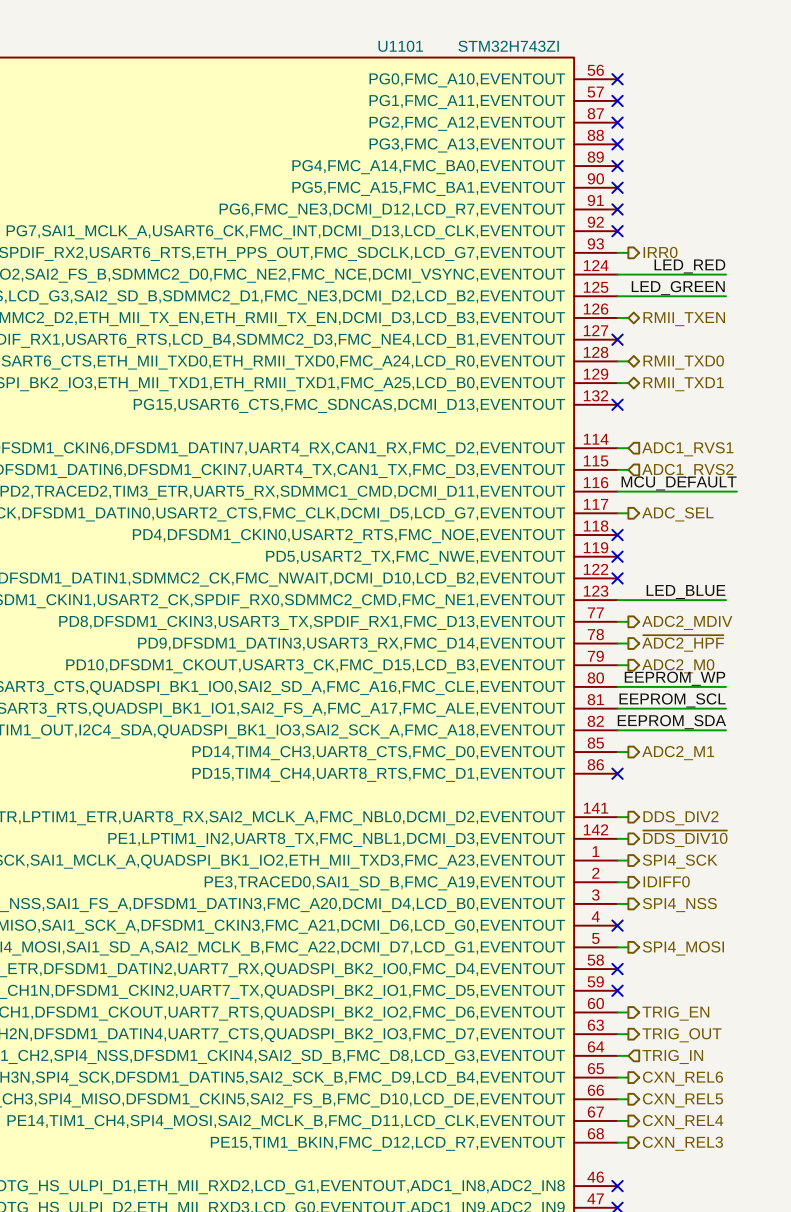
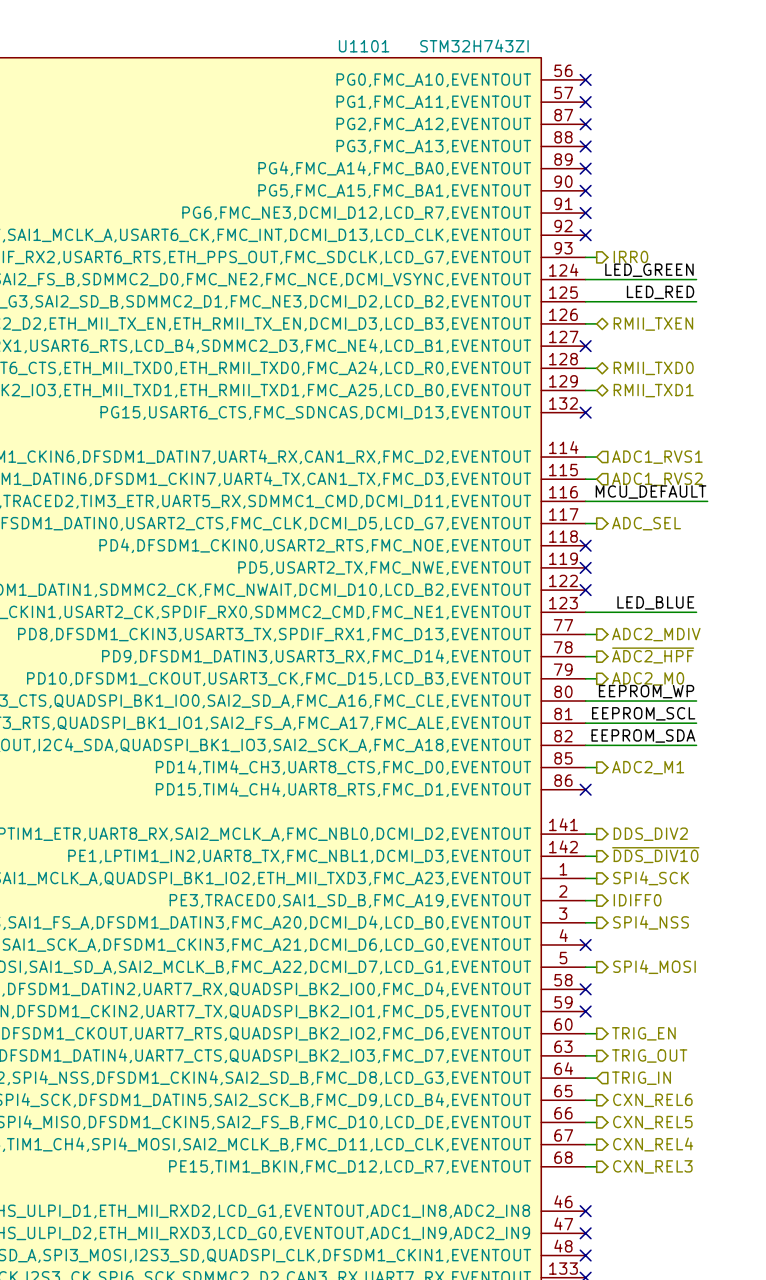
label: LED_RED (689, 266) -> LED_GREEN (649, 270)
label: LED_GREEN (678, 288) -> LED_RED (660, 292)

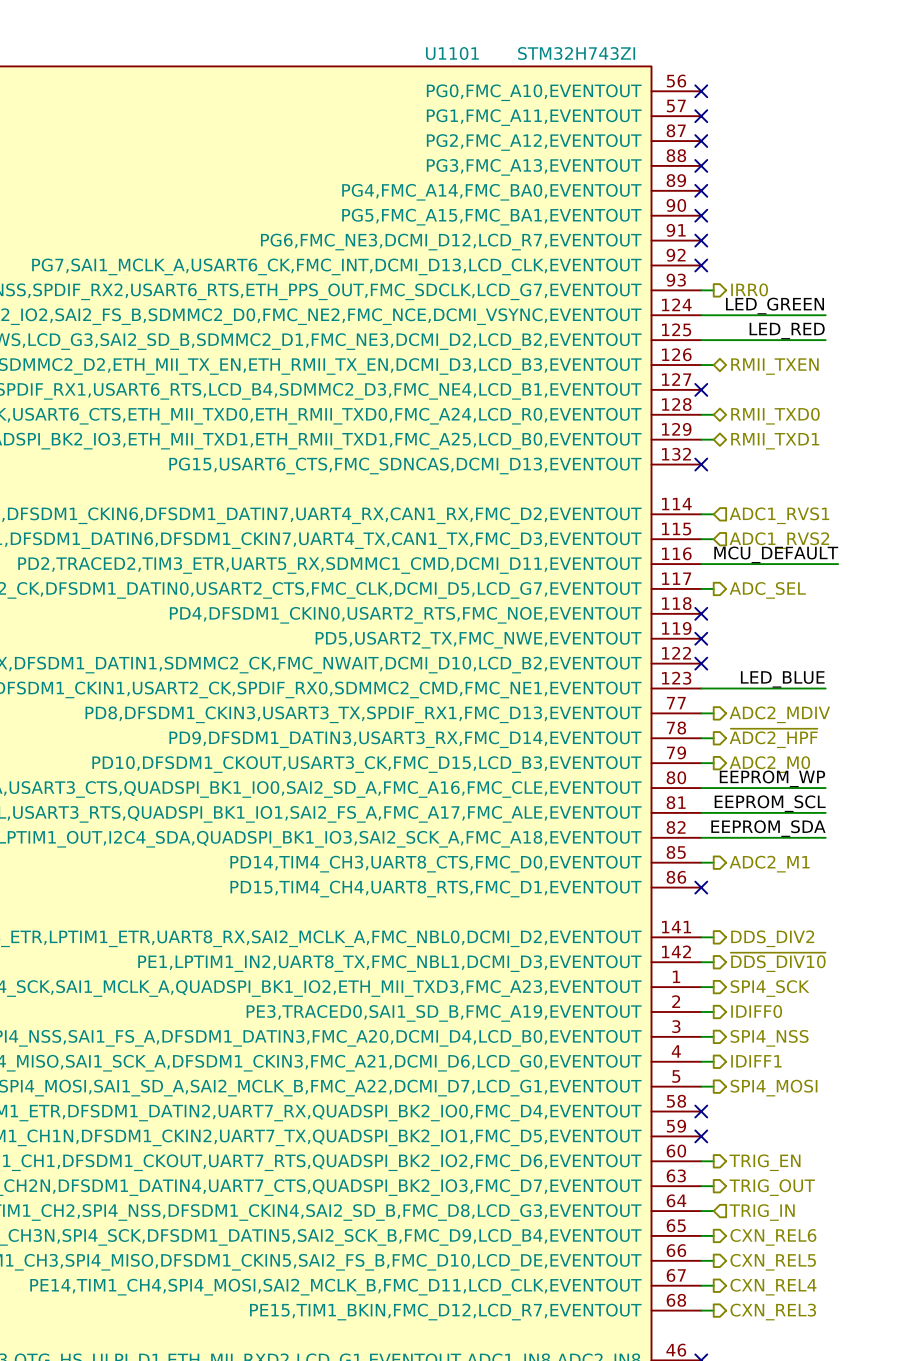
wire: none -> (701, 1061) (713, 1061)
no-connect mark: (585, 944) -> none
hierarchical label: none -> IDIFF1 (756, 1061)

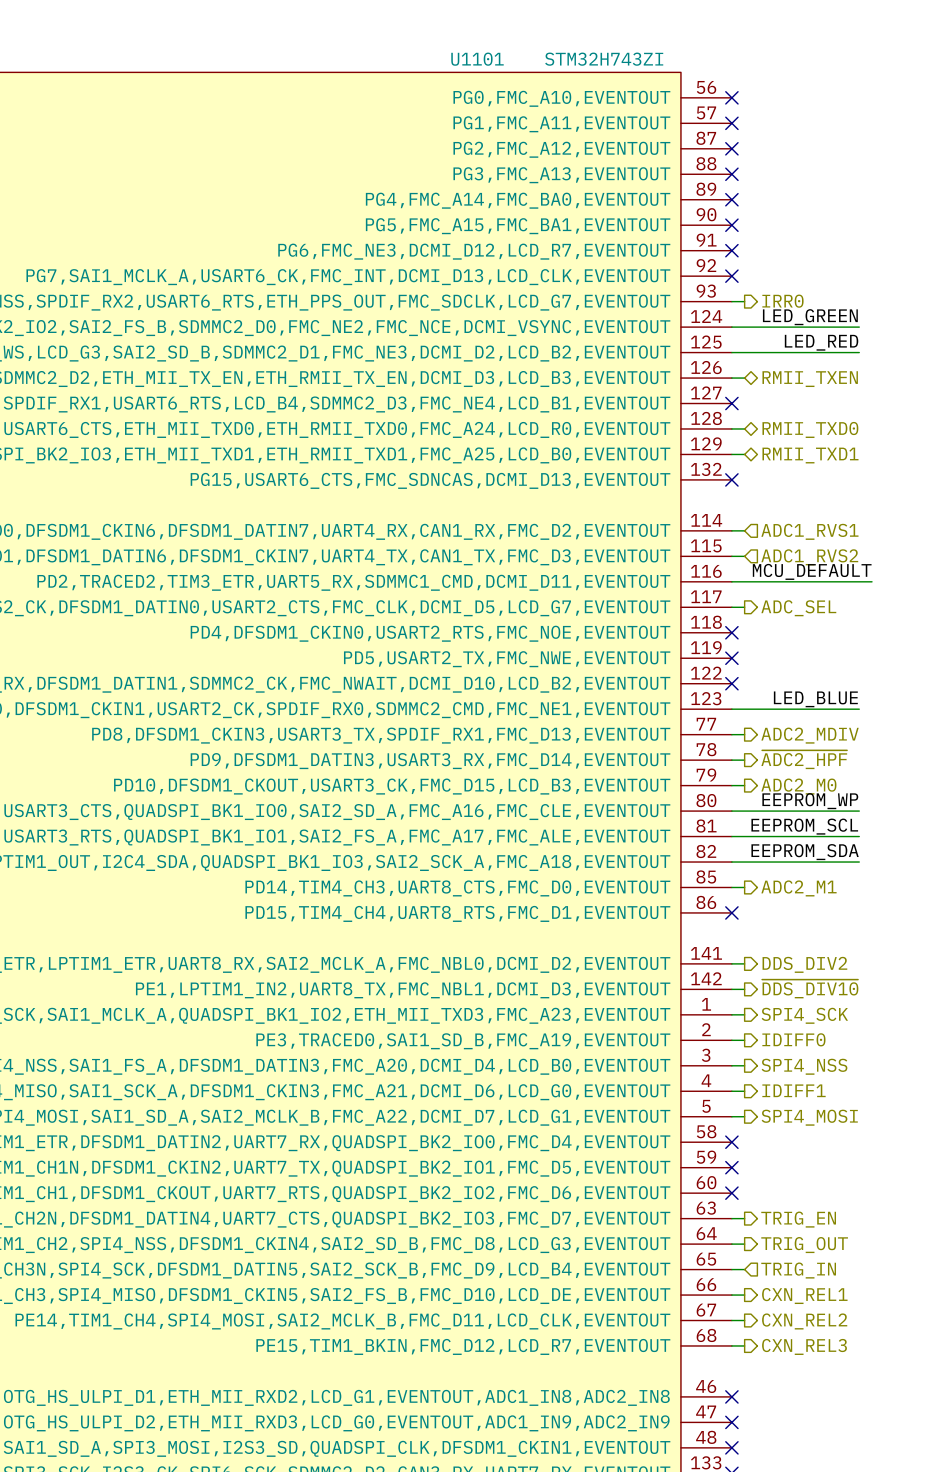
wire: (701, 1161) (713, 1161) -> none
no-connect mark: none -> (731, 1193)
hierarchical label: TRIG_EN (764, 1162) -> none
hierarchical label: TRIG_OUT (772, 1187) -> TRIG_EN (798, 1219)
hierarchical label shape: input (762, 1212) -> output (804, 1245)
hierarchical label: TRIG_IN (762, 1212) -> TRIG_OUT (804, 1245)
hierarchical label shape: output (773, 1237) -> input (798, 1270)
hierarchical label: CXN_REL6 (773, 1237) -> TRIG_IN (798, 1270)
hierarchical label: CXN_REL5 (773, 1262) -> CXN_REL1 (804, 1296)
hierarchical label: CXN_REL4 (773, 1287) -> CXN_REL2 (804, 1321)

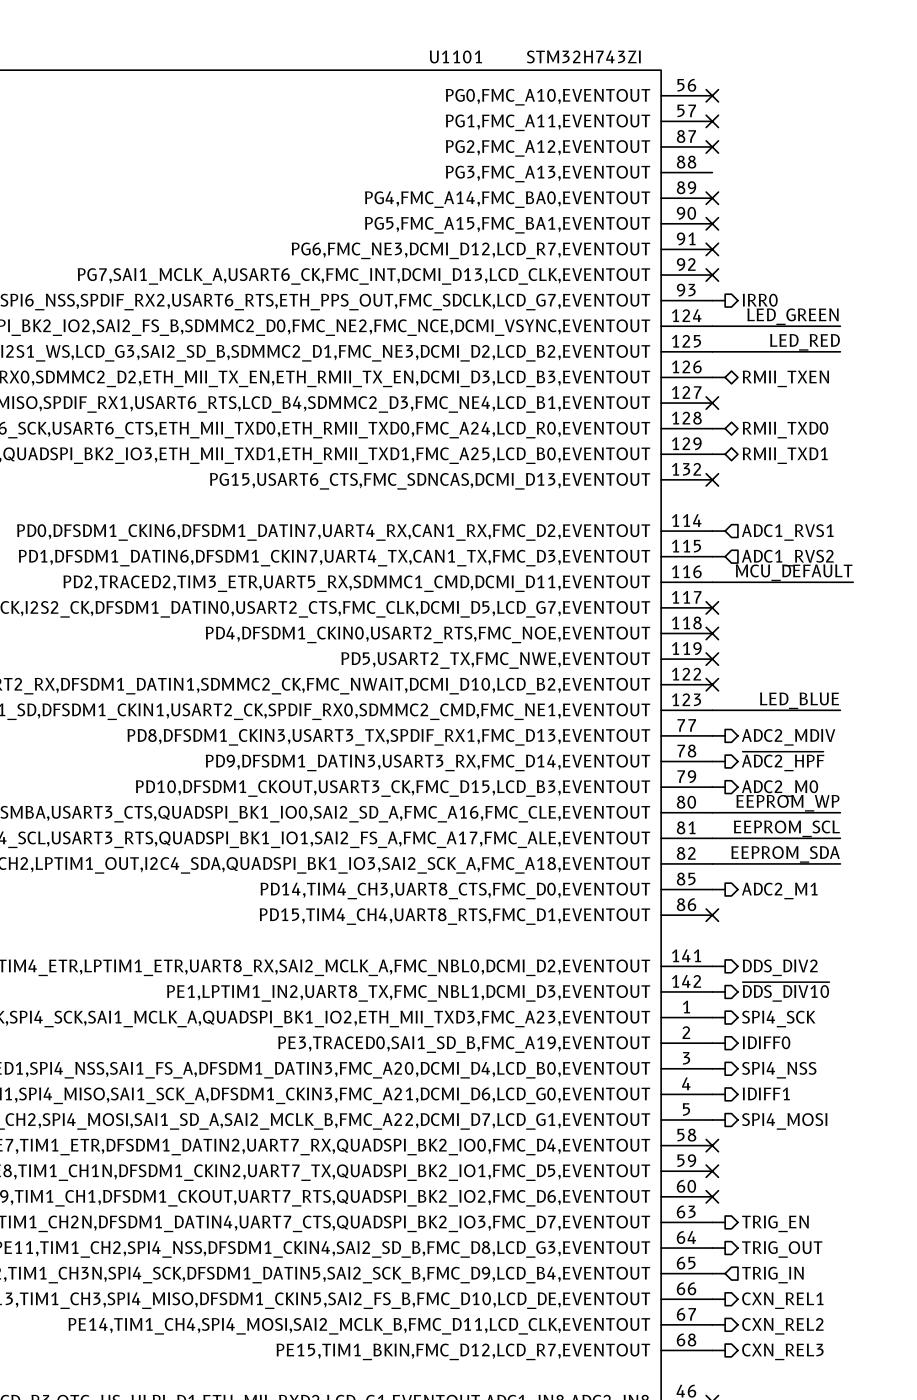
no-connect mark: (731, 174) -> none
wire: (731, 607) (744, 607) -> none
no-connect mark: none -> (712, 607)
hierarchical label: ADC_SEL (798, 608) -> none

